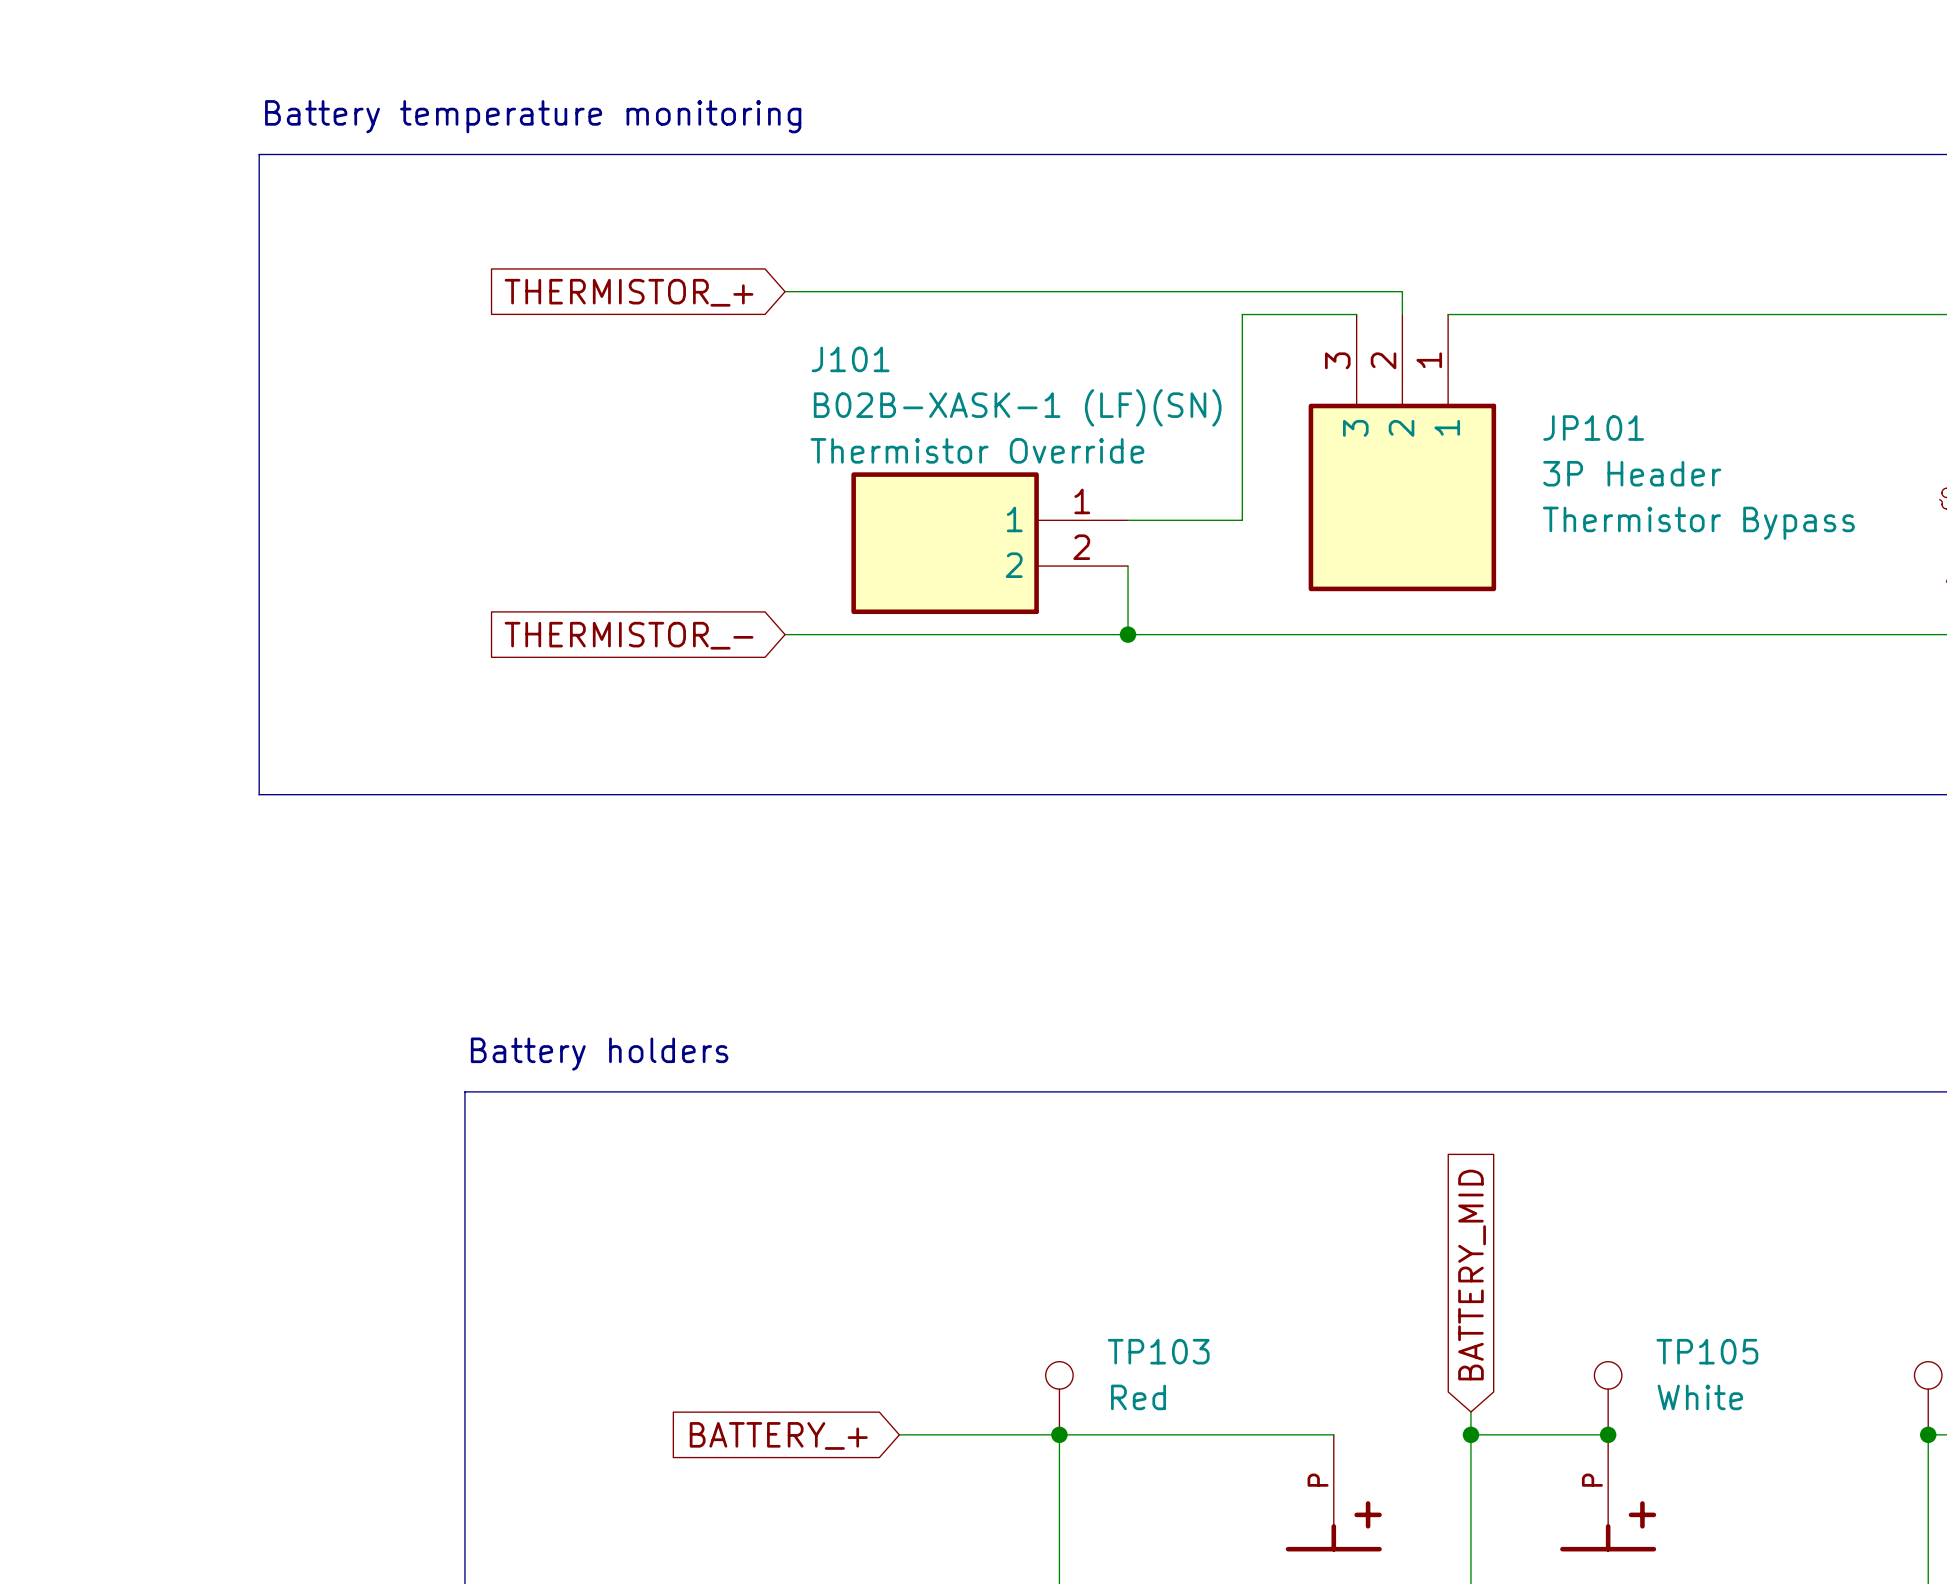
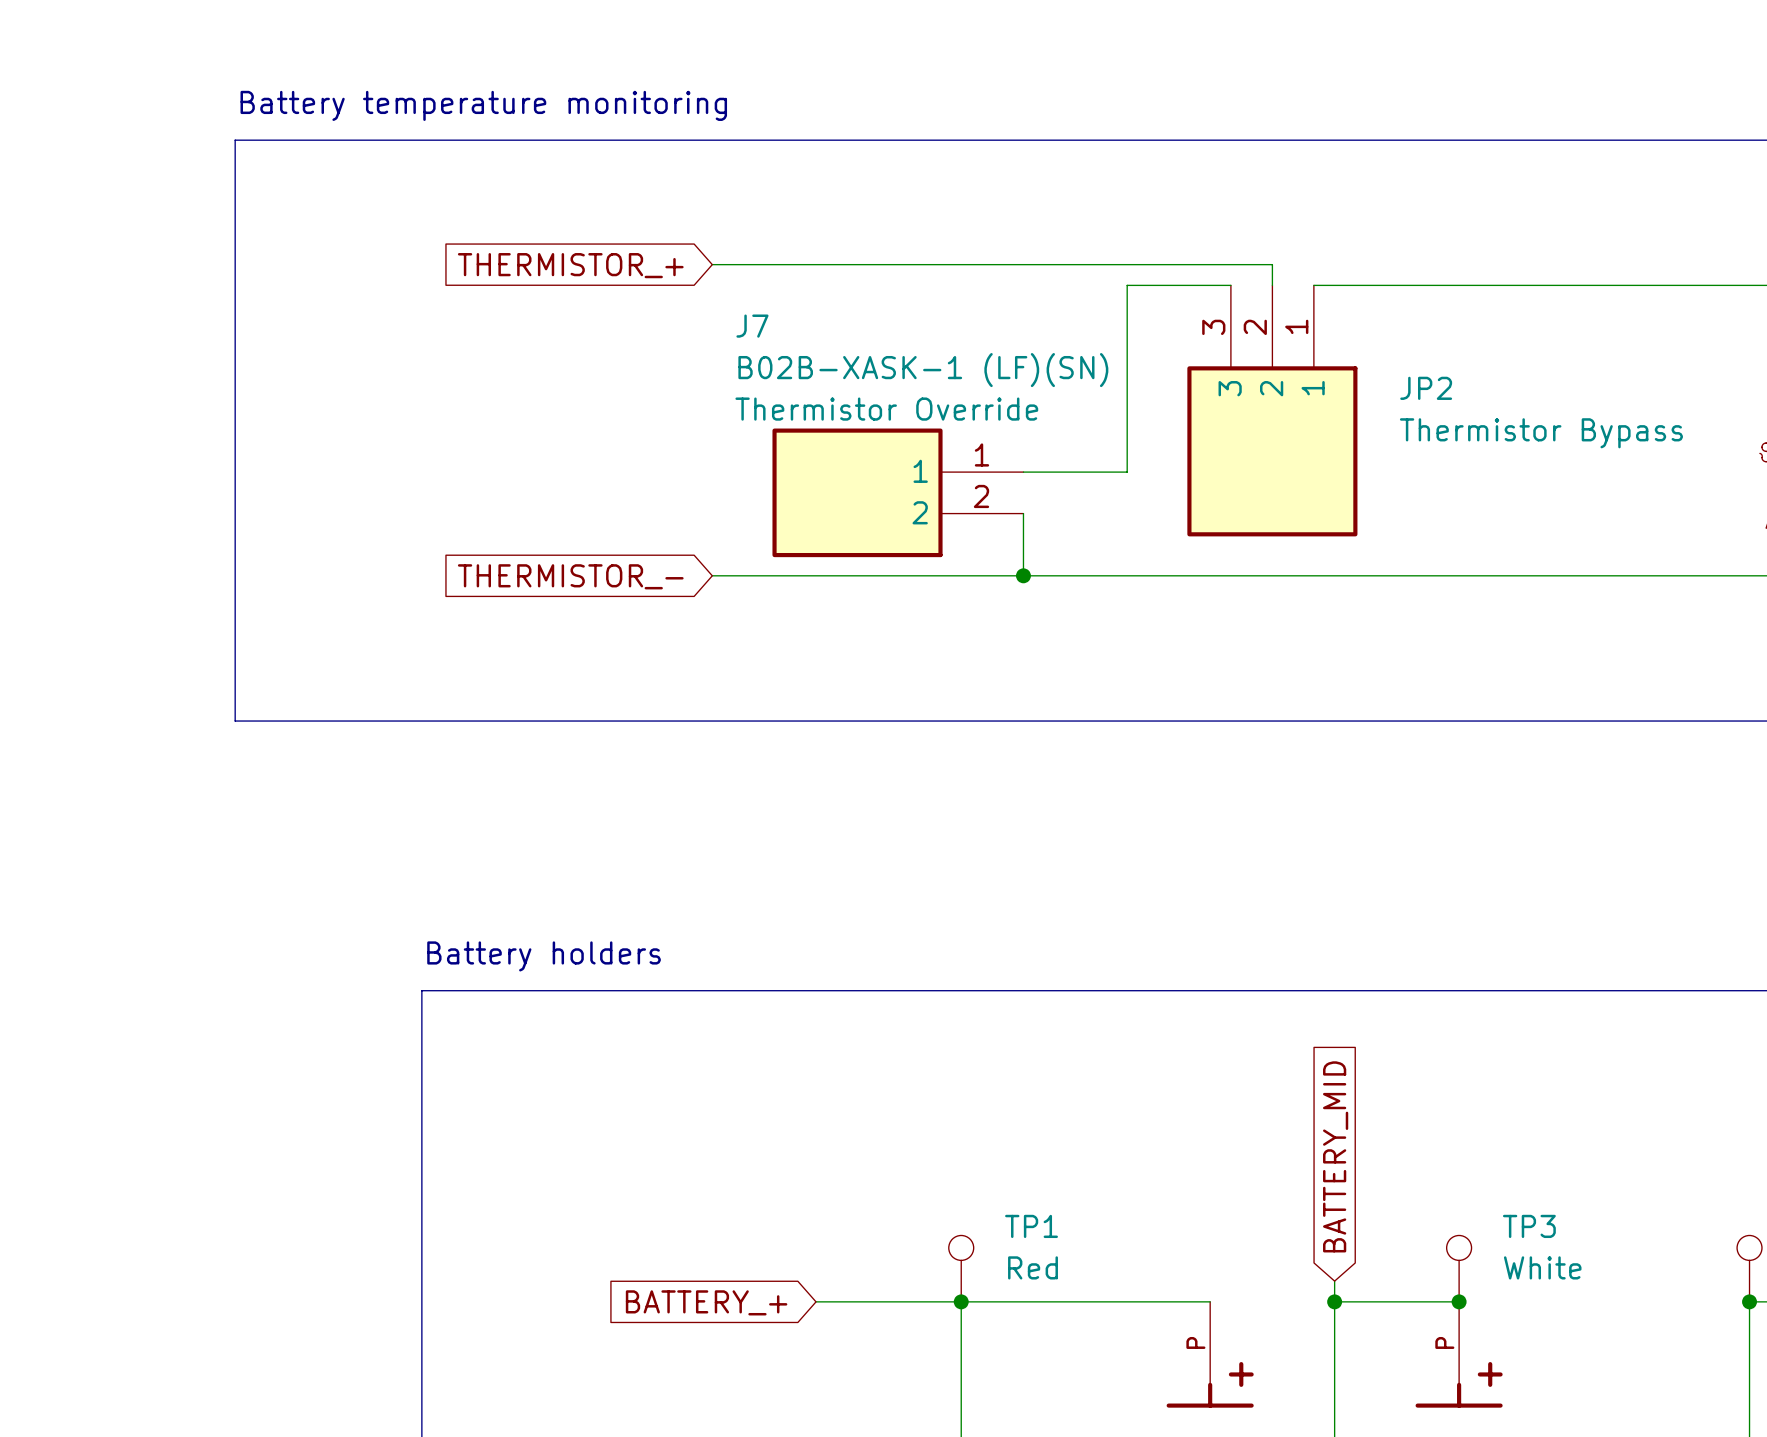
J101 name: J101 (850, 359) -> J7 (752, 326)
JP101 name: JP101 (1593, 428) -> JP2 (1426, 388)
JP101 value: 3P Header (1632, 473) -> none
JP101 text position: Thermistor Bypass (1698, 523) -> Thermistor Bypass (1541, 433)
TP103 name: TP103 (1158, 1351) -> TP1 (1031, 1226)
TP105 name: TP105 (1707, 1351) -> TP3 (1529, 1226)

